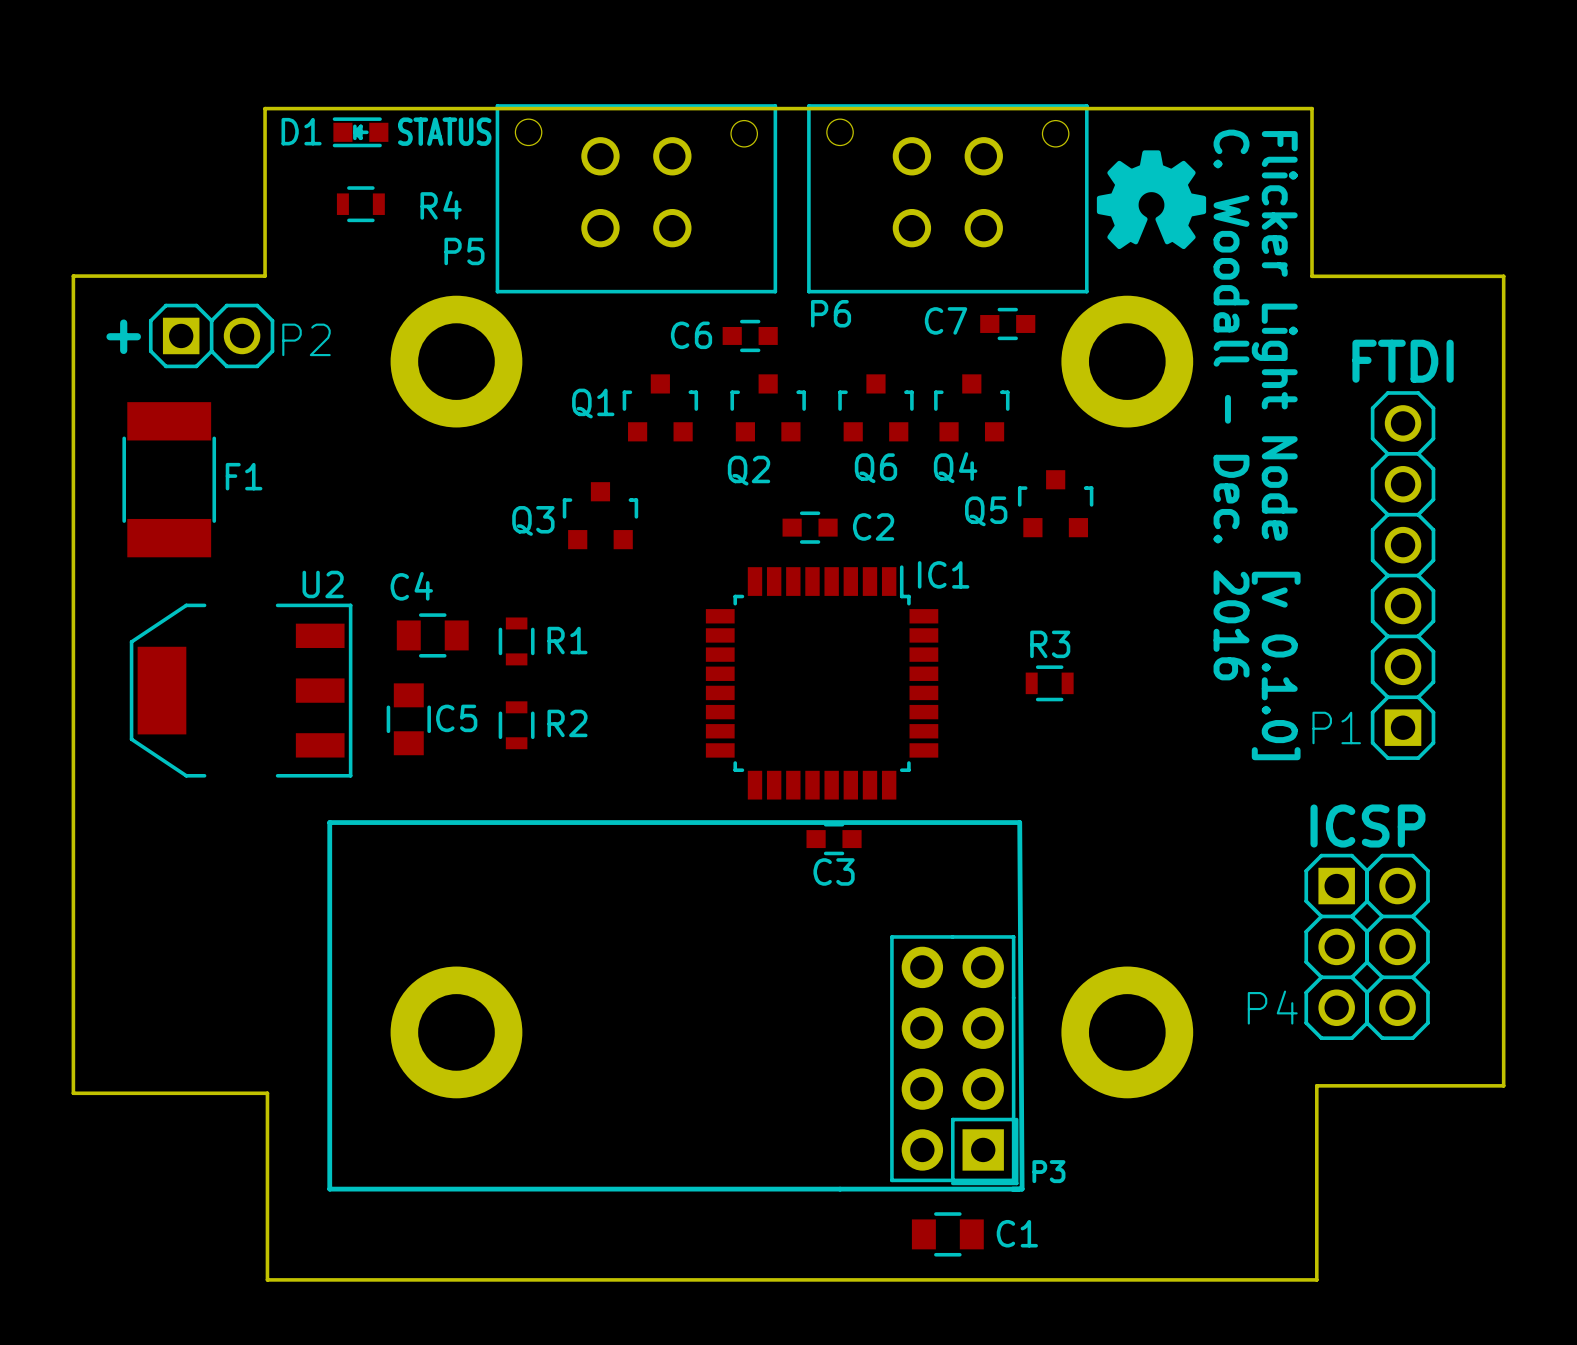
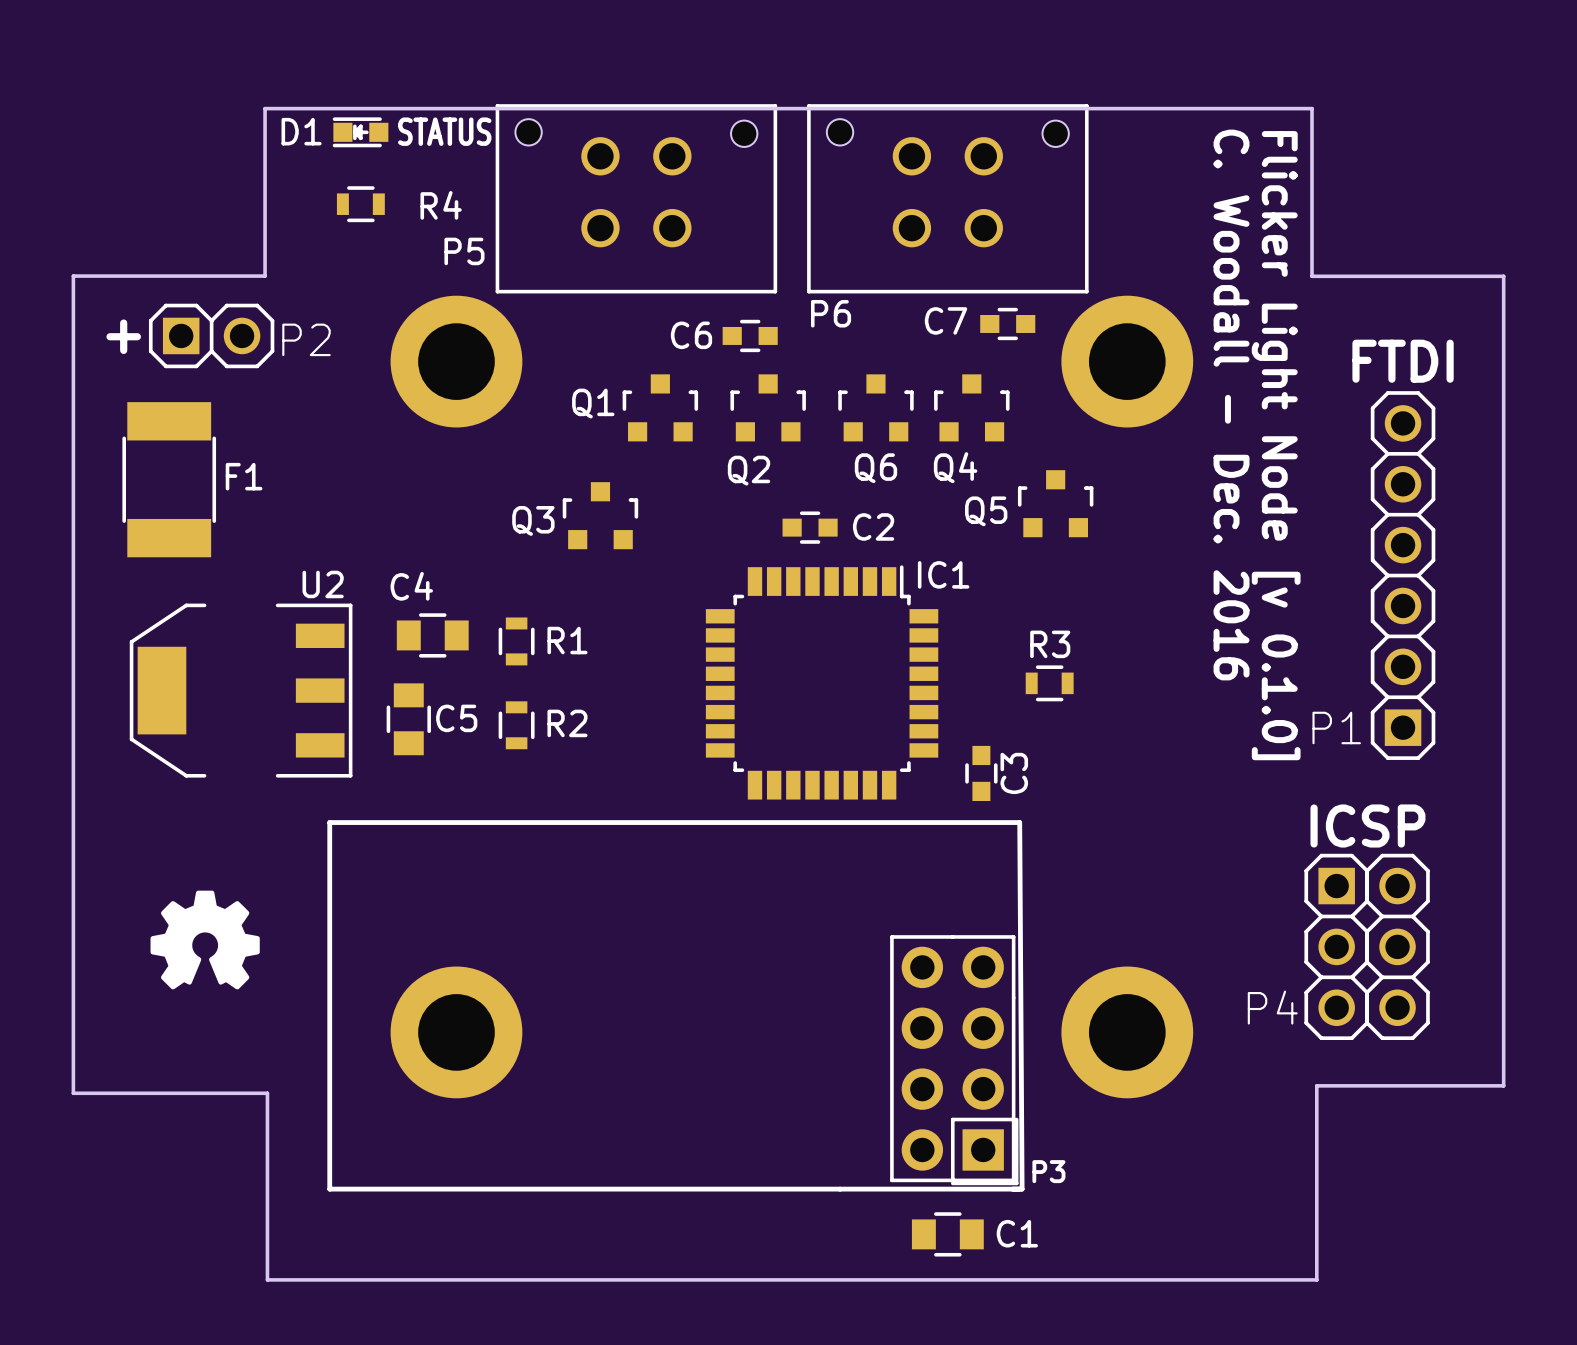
drawing: [1096, 150, 1207, 250] -> none
C3 rotation: 0° (834, 839) -> 90° clockwise (981, 773)
C3 position: (834, 839) -> (981, 773)
C3 name position: C3 (834, 871) -> C3 (1014, 773)
drawing: none -> [150, 890, 260, 990]

